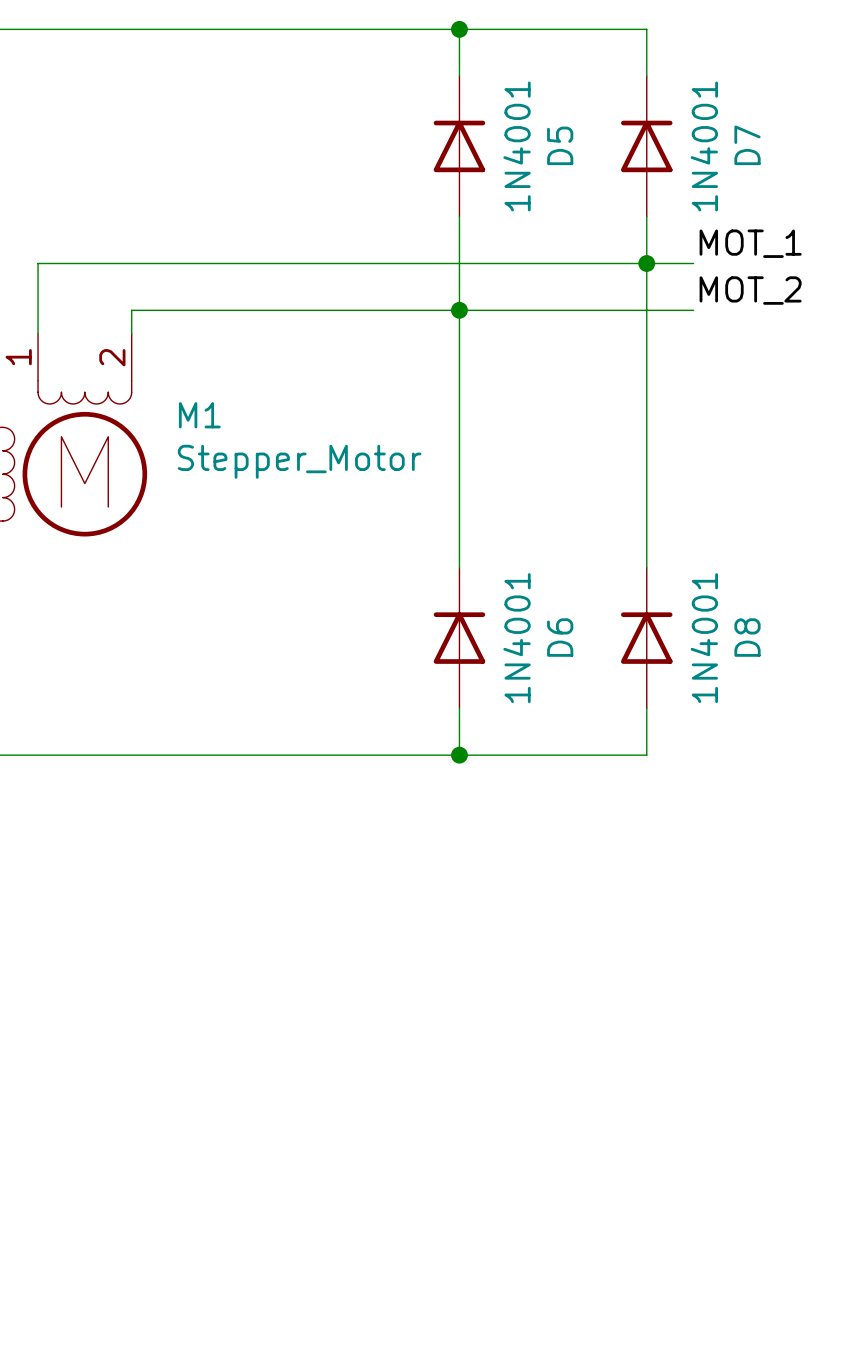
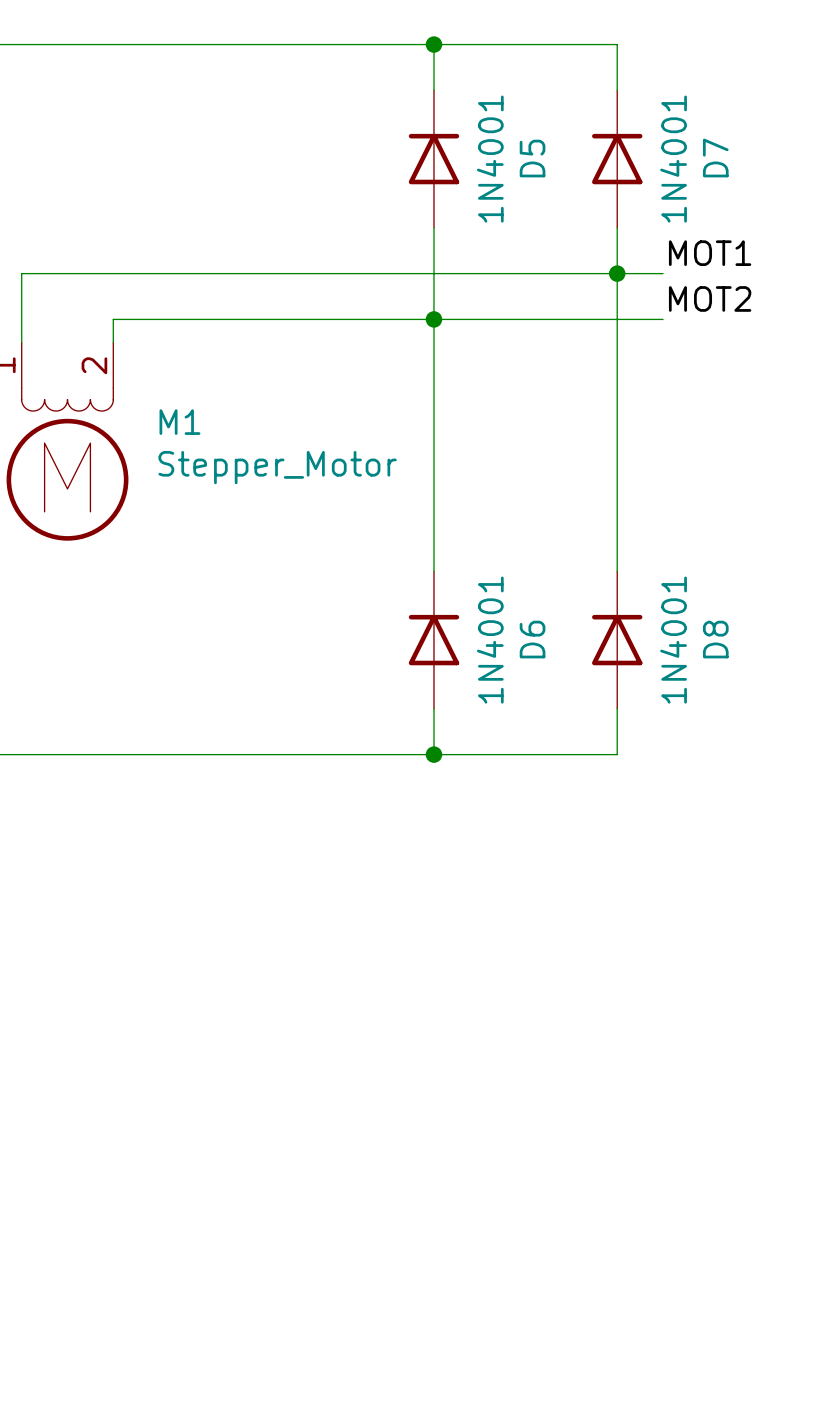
label: MOT_1 (750, 243) -> MOT1 (710, 253)
label: MOT_2 (750, 290) -> MOT2 (710, 298)

